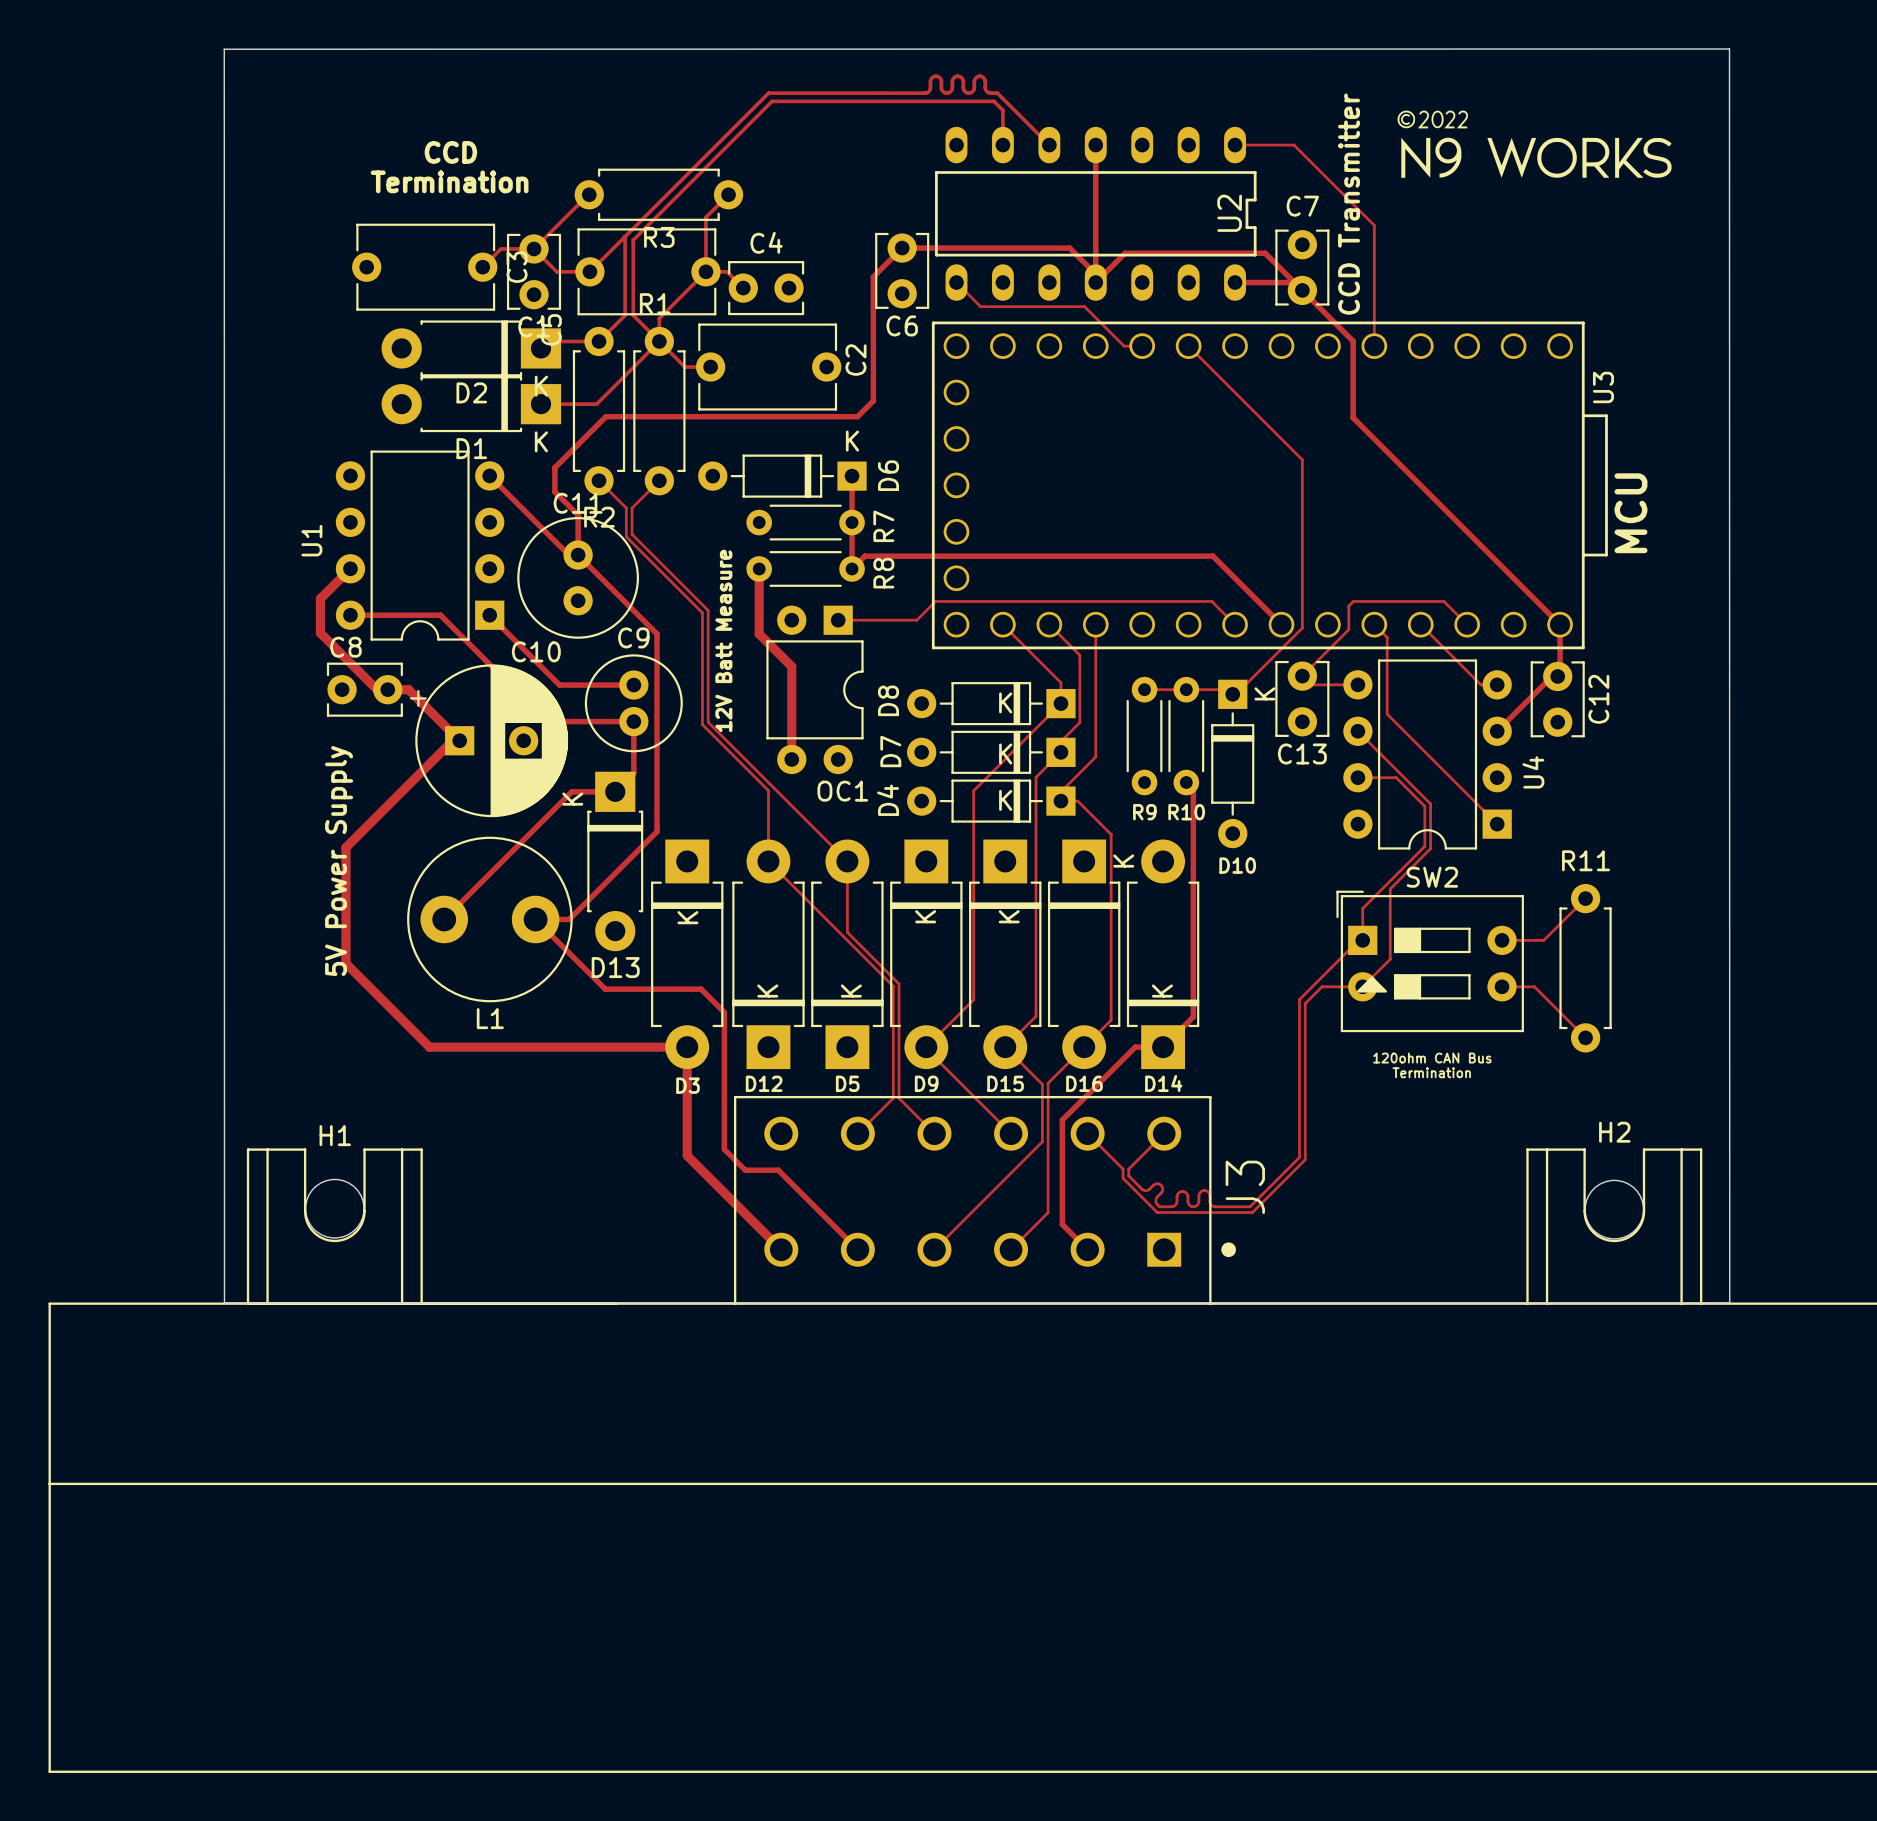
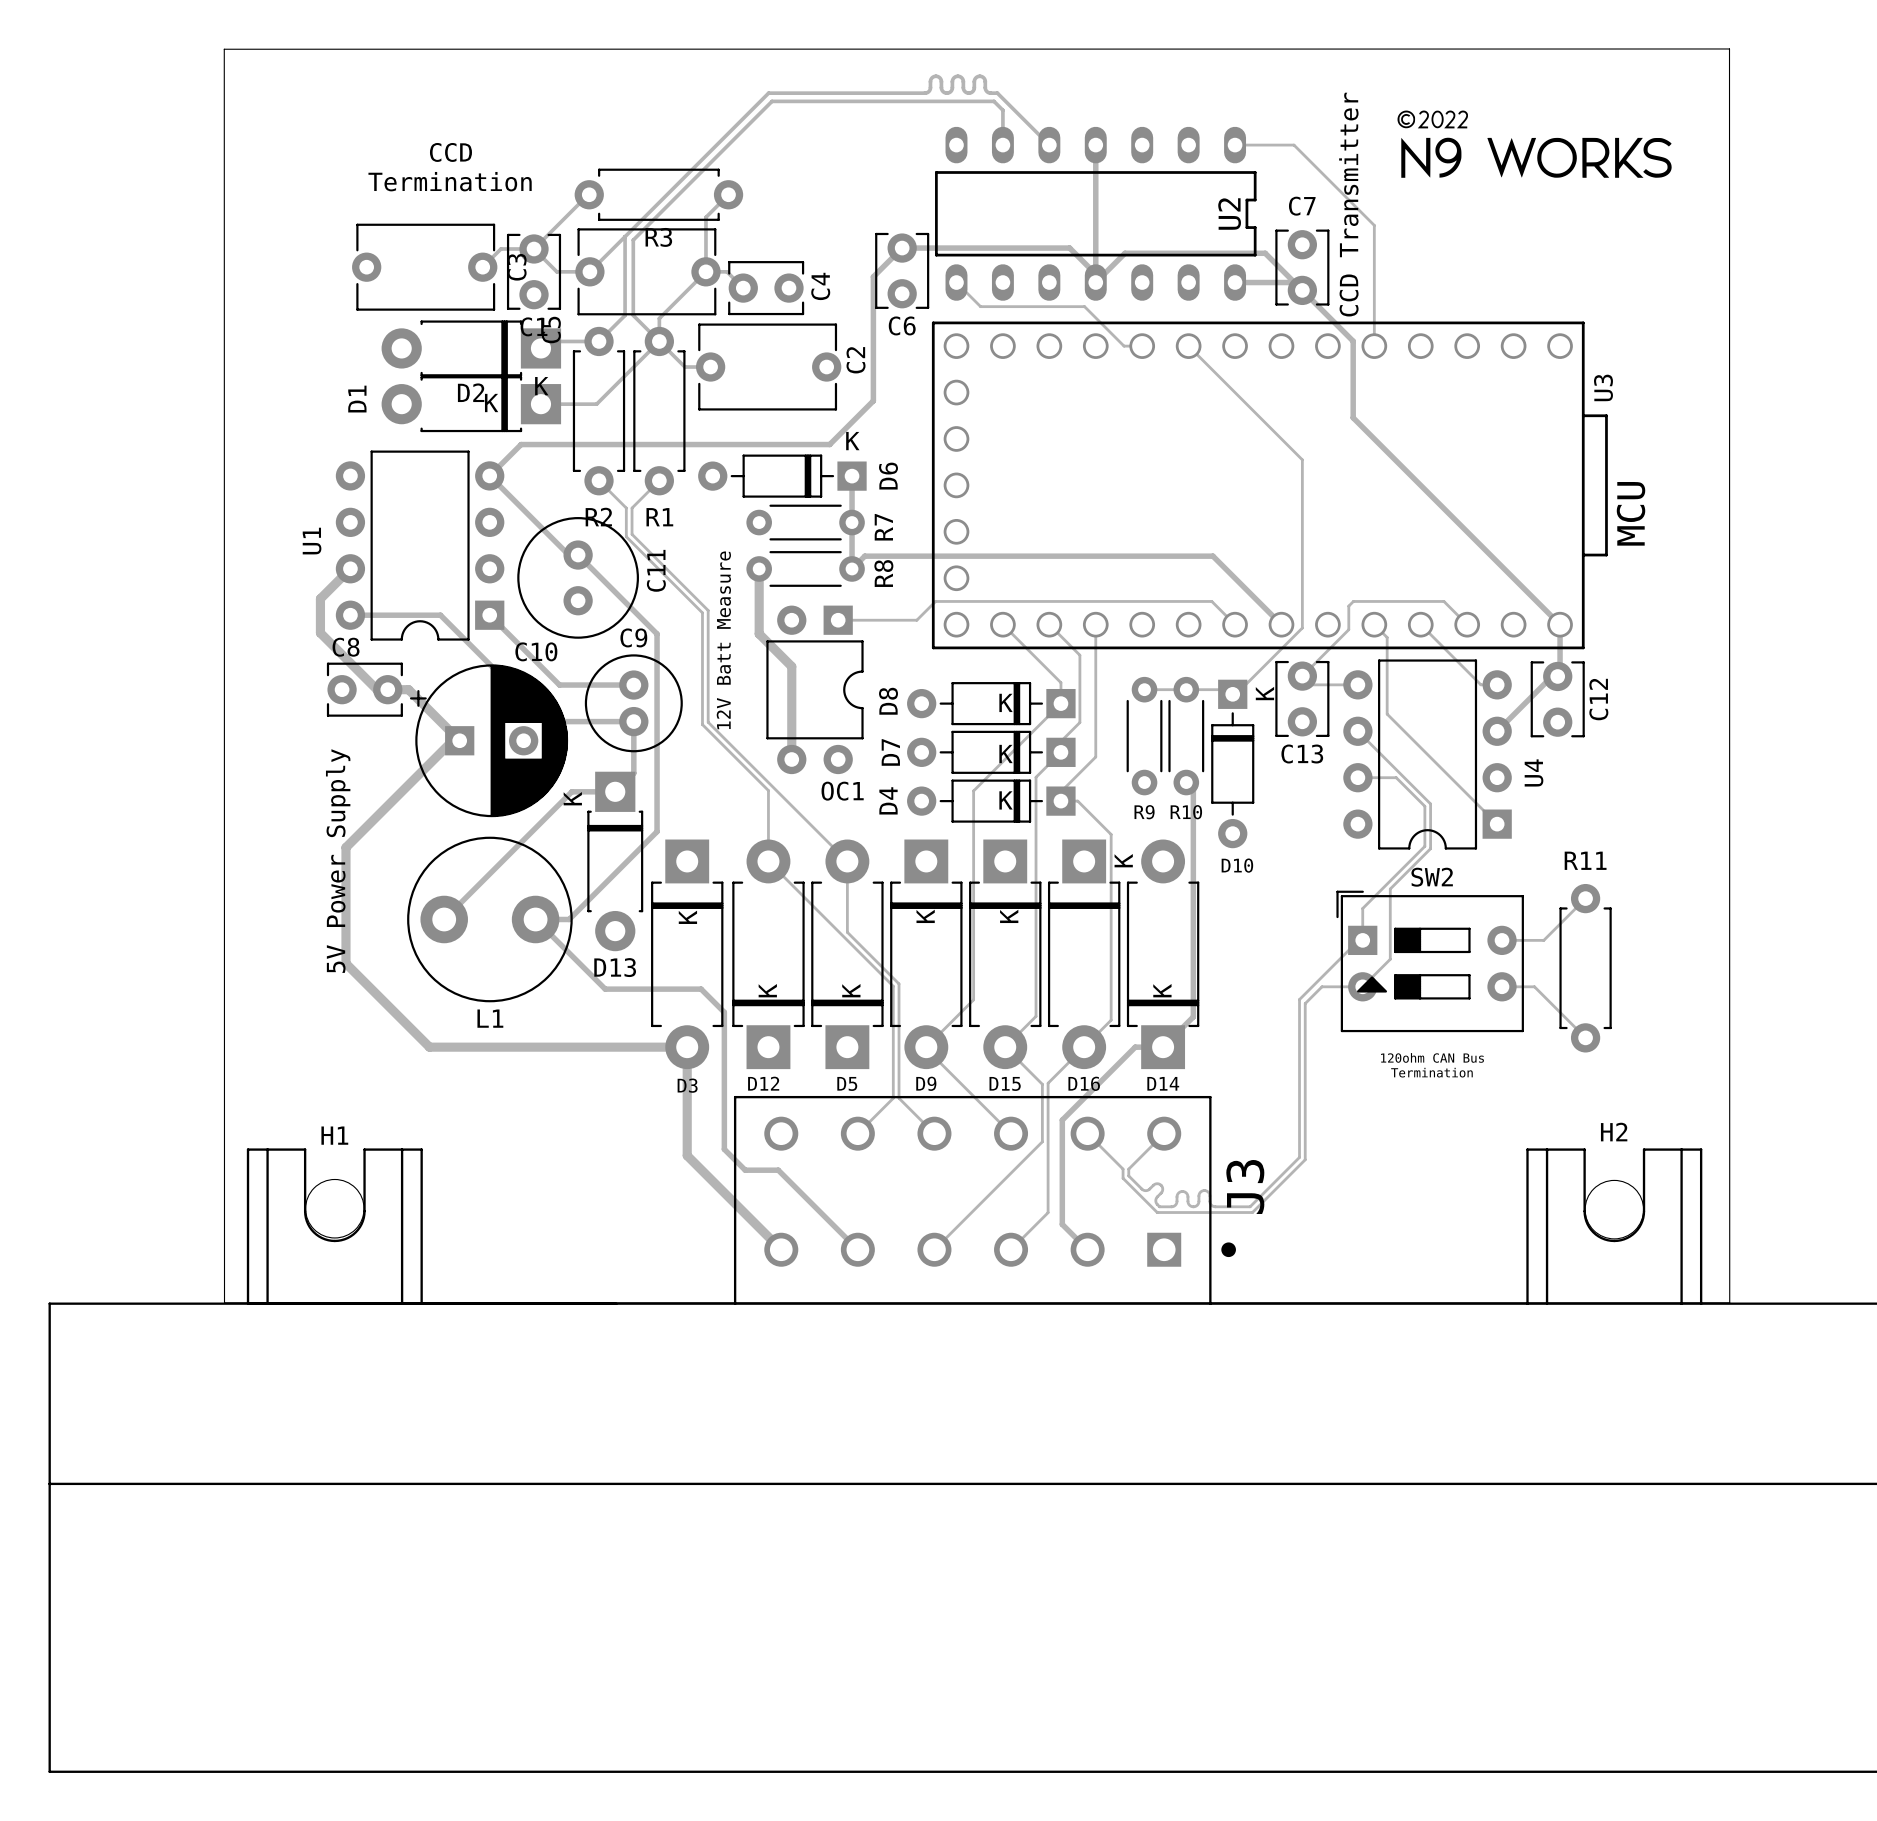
C4 name rotation: 0° (766, 242) -> 90° counterclockwise (820, 286)
C4 name position: C4 (766, 242) -> C4 (820, 286)
R1 name position: R1 (655, 303) -> R1 (659, 517)
track: (857, 416) (605, 416) (554, 467) (554, 491) (578, 515) (578, 555) -> (857, 416) (829, 444) (521, 444) (489, 475)
D1 text position: K (541, 441) -> K (491, 403)
D1 name rotation: 0° (471, 448) -> 90° counterclockwise (357, 399)
D1 name position: D1 (471, 448) -> D1 (357, 399)
C11 name rotation: 0° (578, 503) -> 90° counterclockwise (656, 570)
C11 name position: C11 (578, 503) -> C11 (656, 570)

